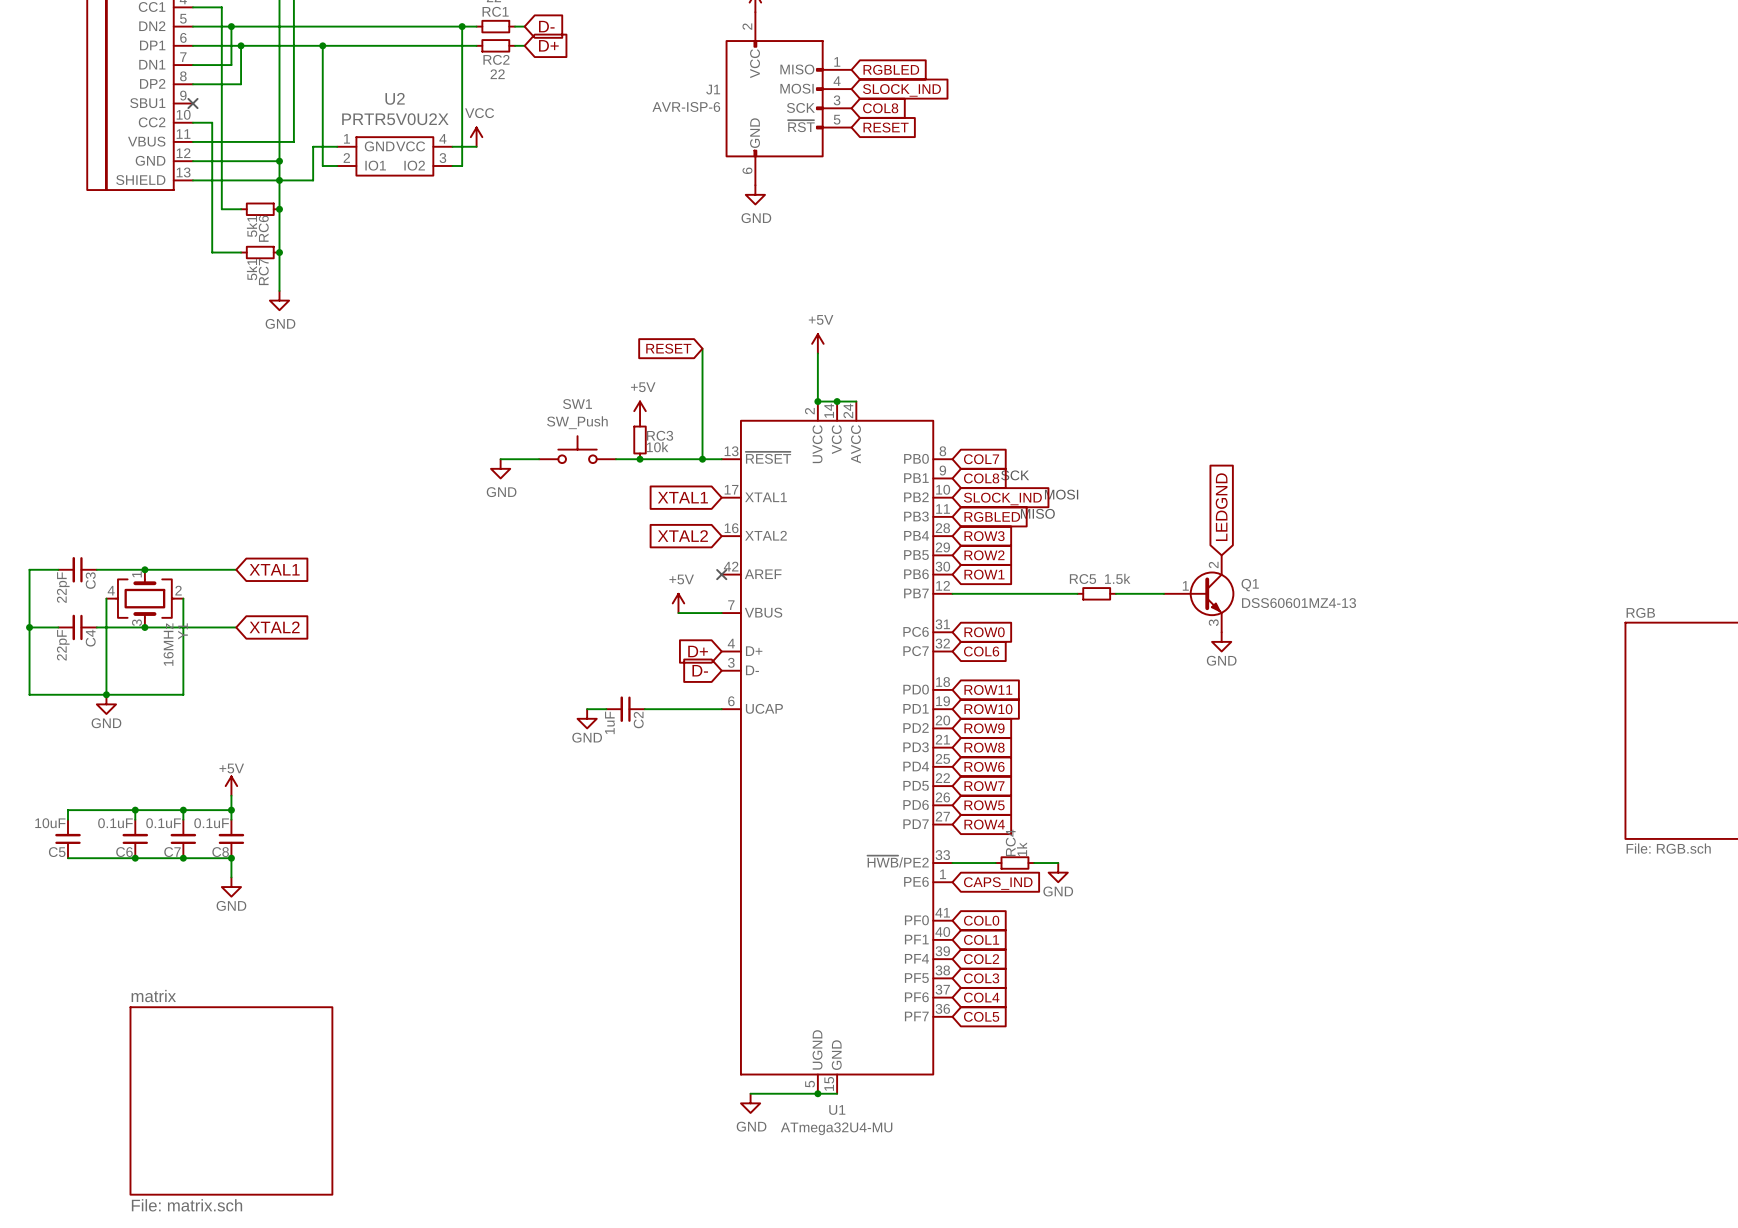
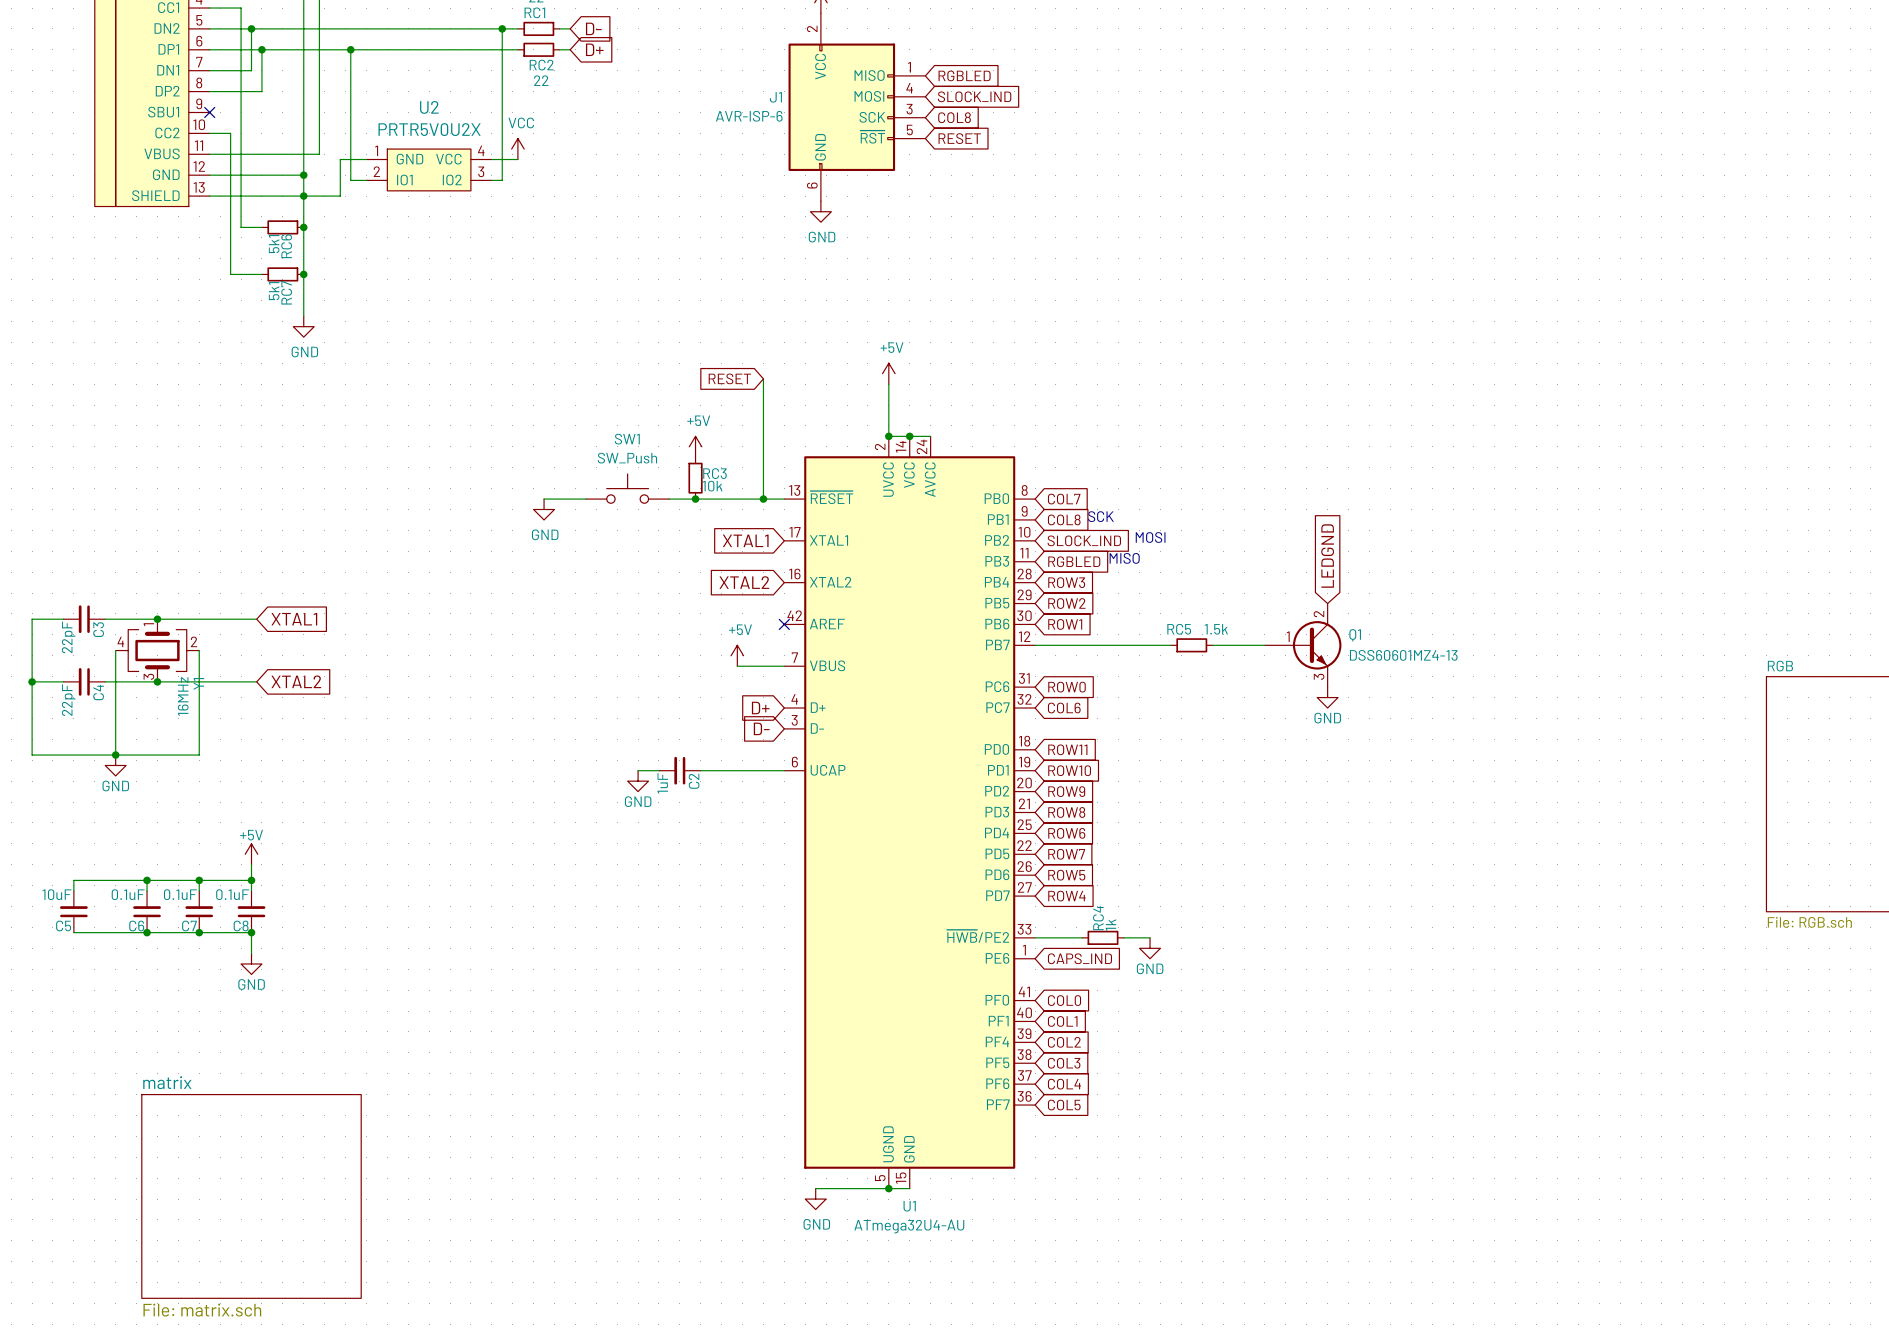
U1 value: ATmega32U4-MU (836, 1128) -> ATmega32U4-AU (909, 1226)

